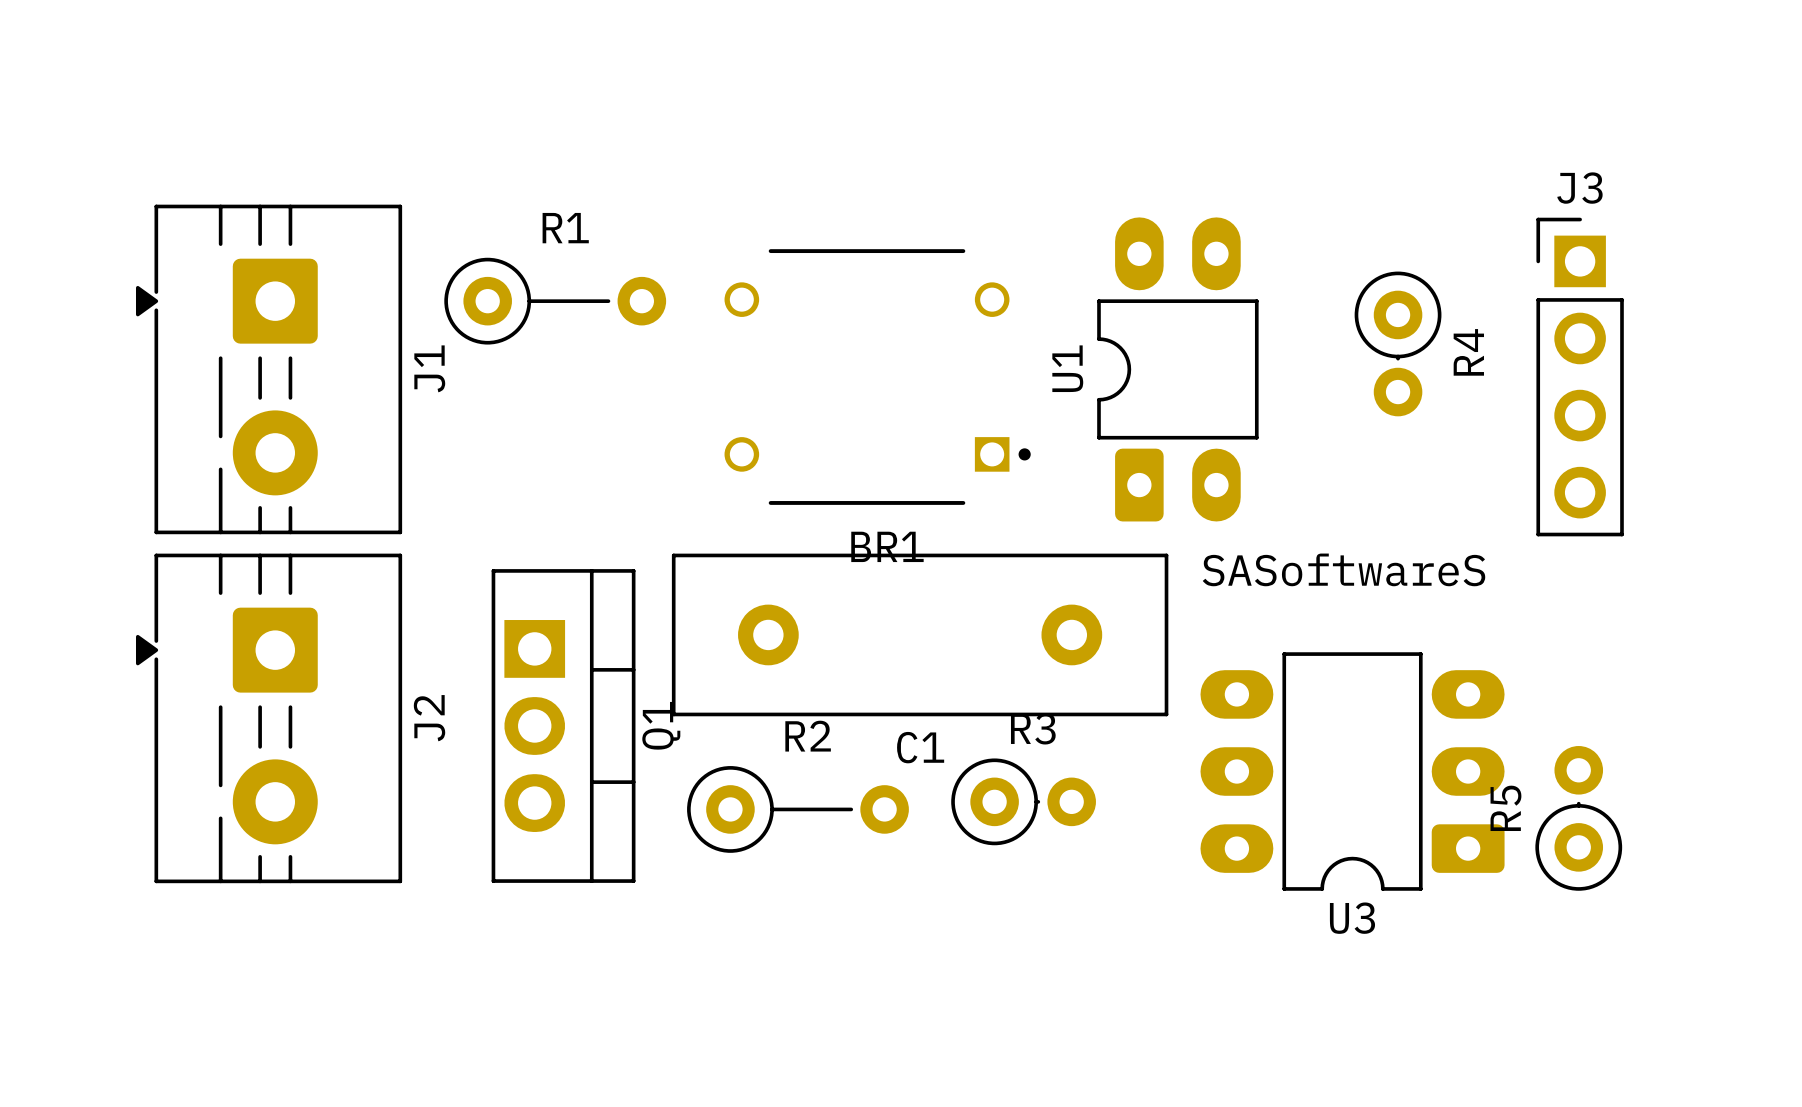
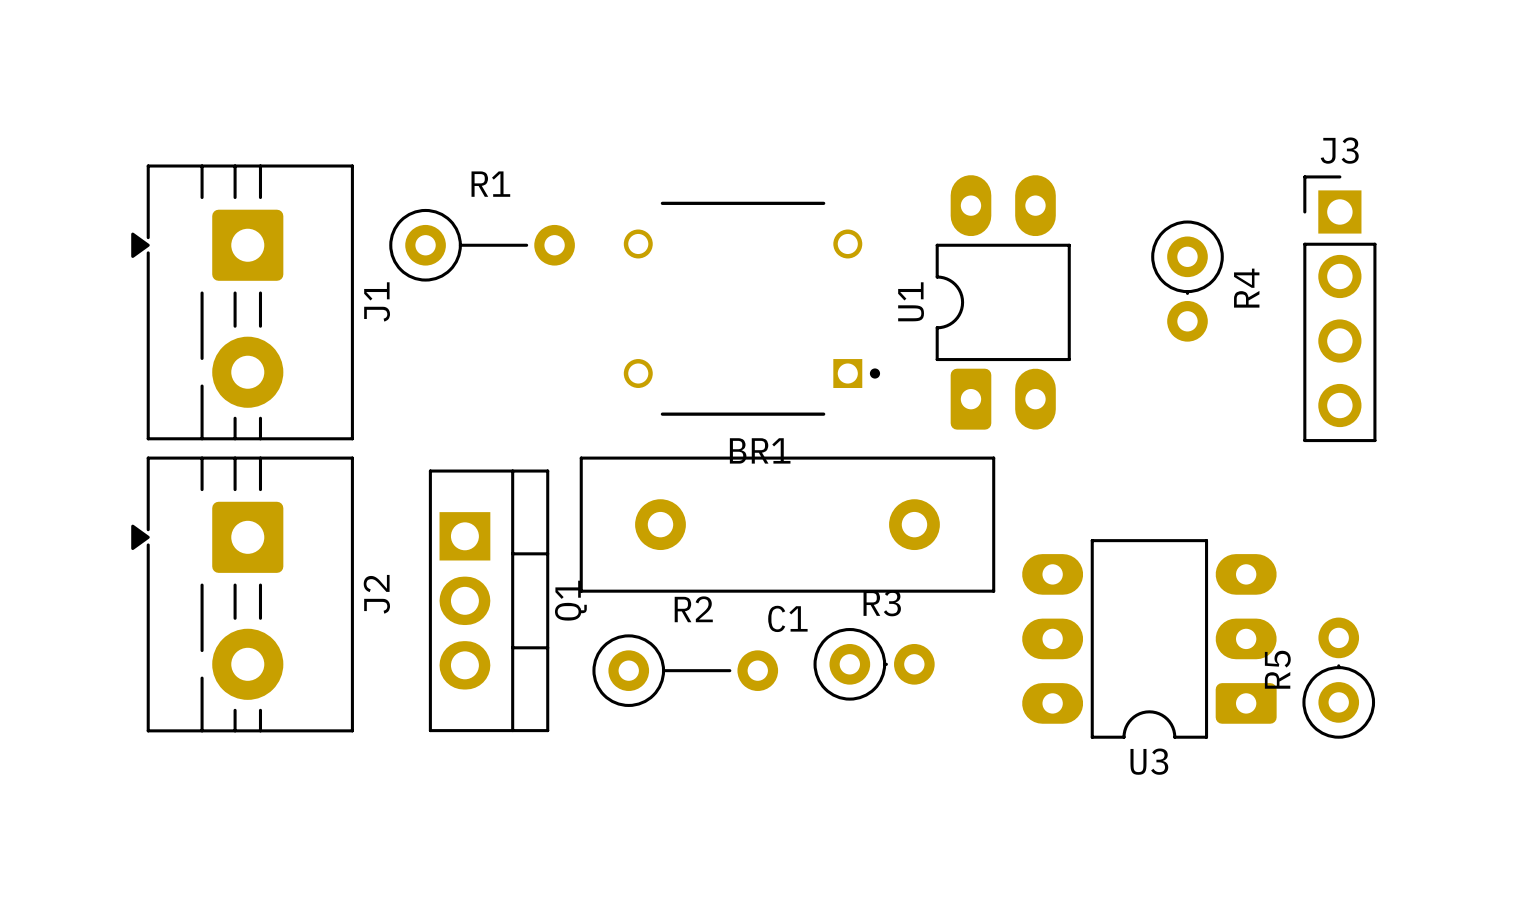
text: SASoftwareS (1343, 569) -> none

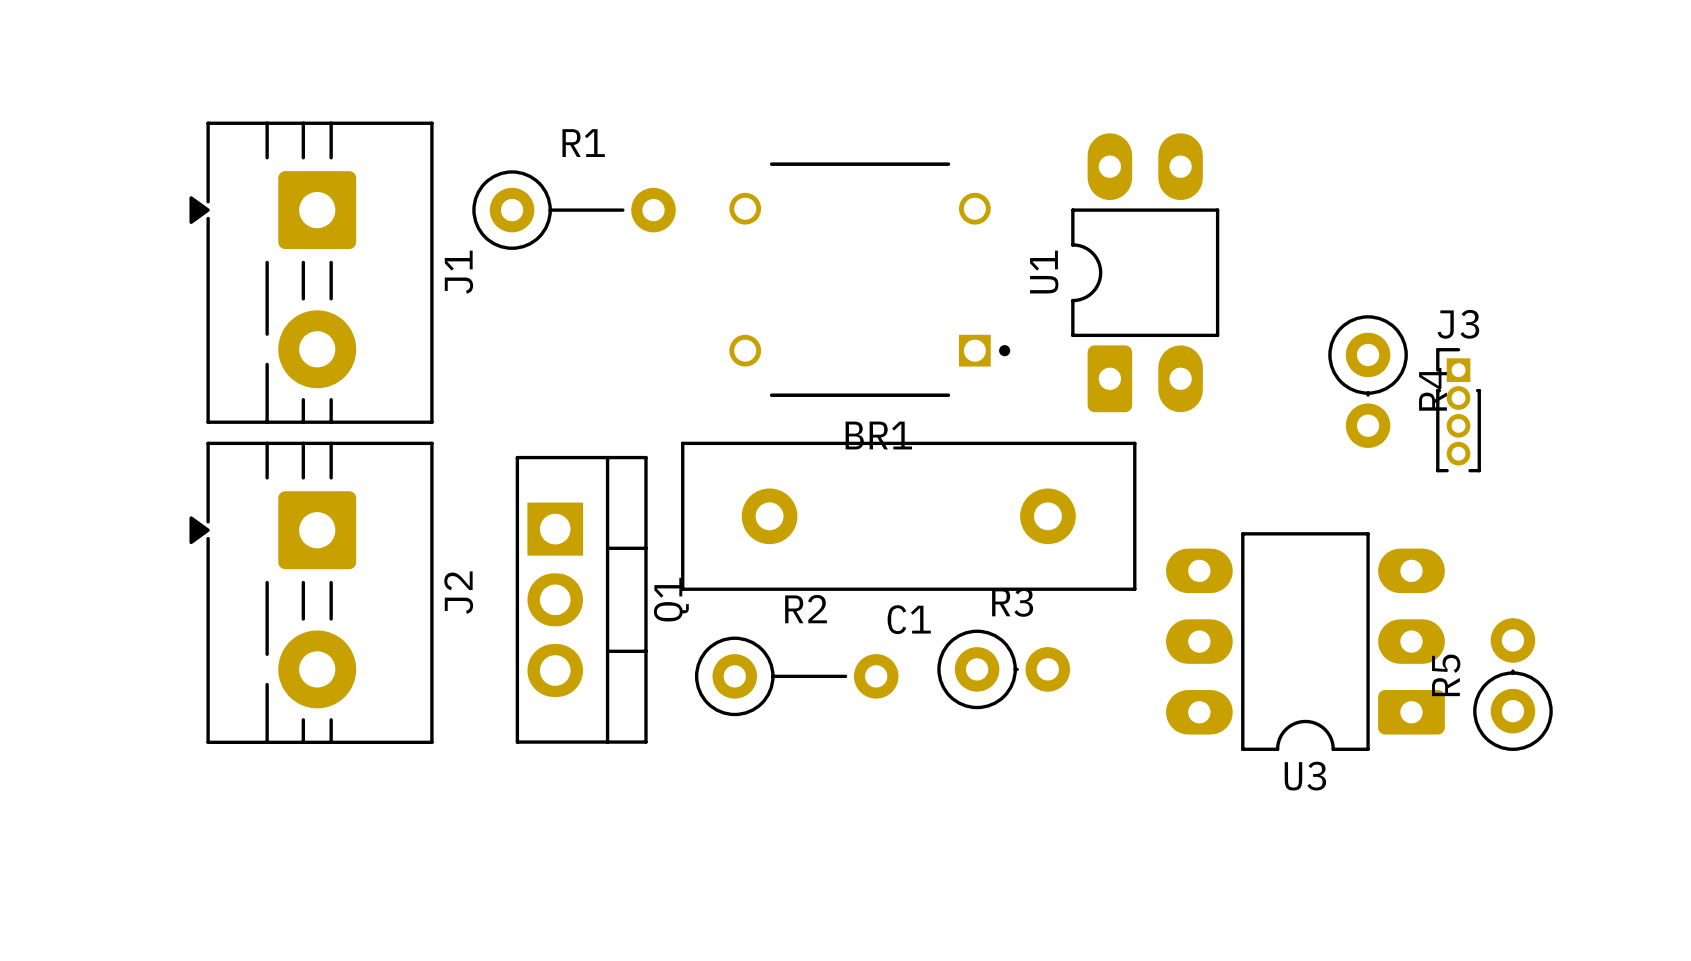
J3 name position: J3 (1339, 150) -> J3 (1458, 324)
J3 footprint: [1303, 175, 1377, 443] -> [1436, 348, 1481, 473]
R4 position: (1187, 281) -> (1368, 381)

